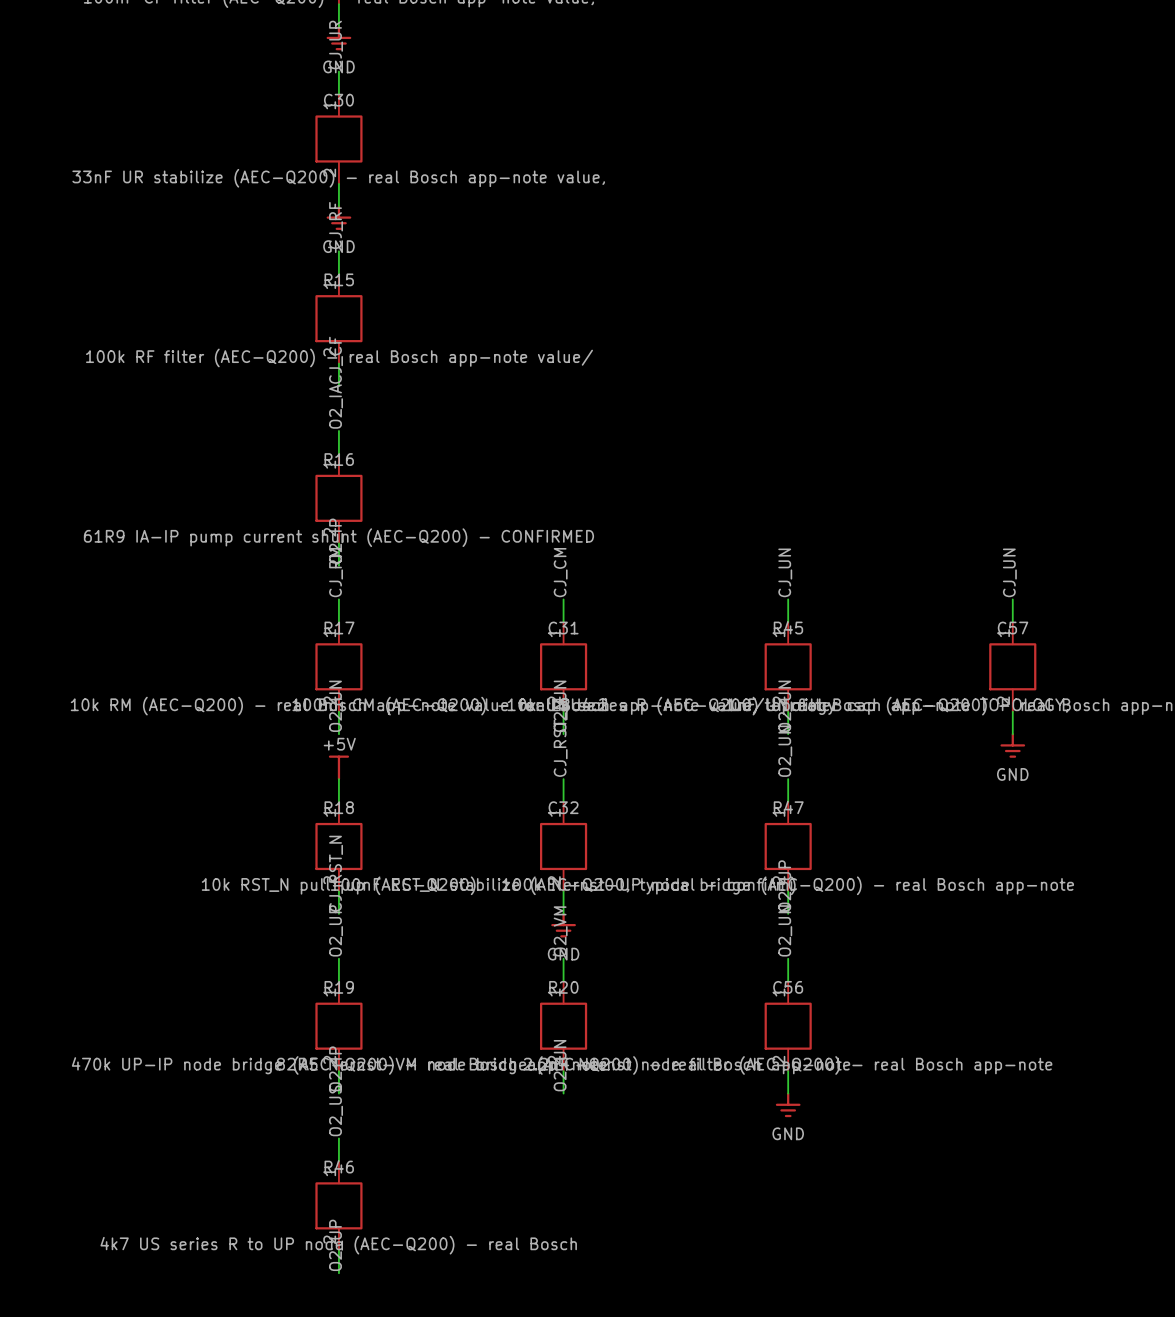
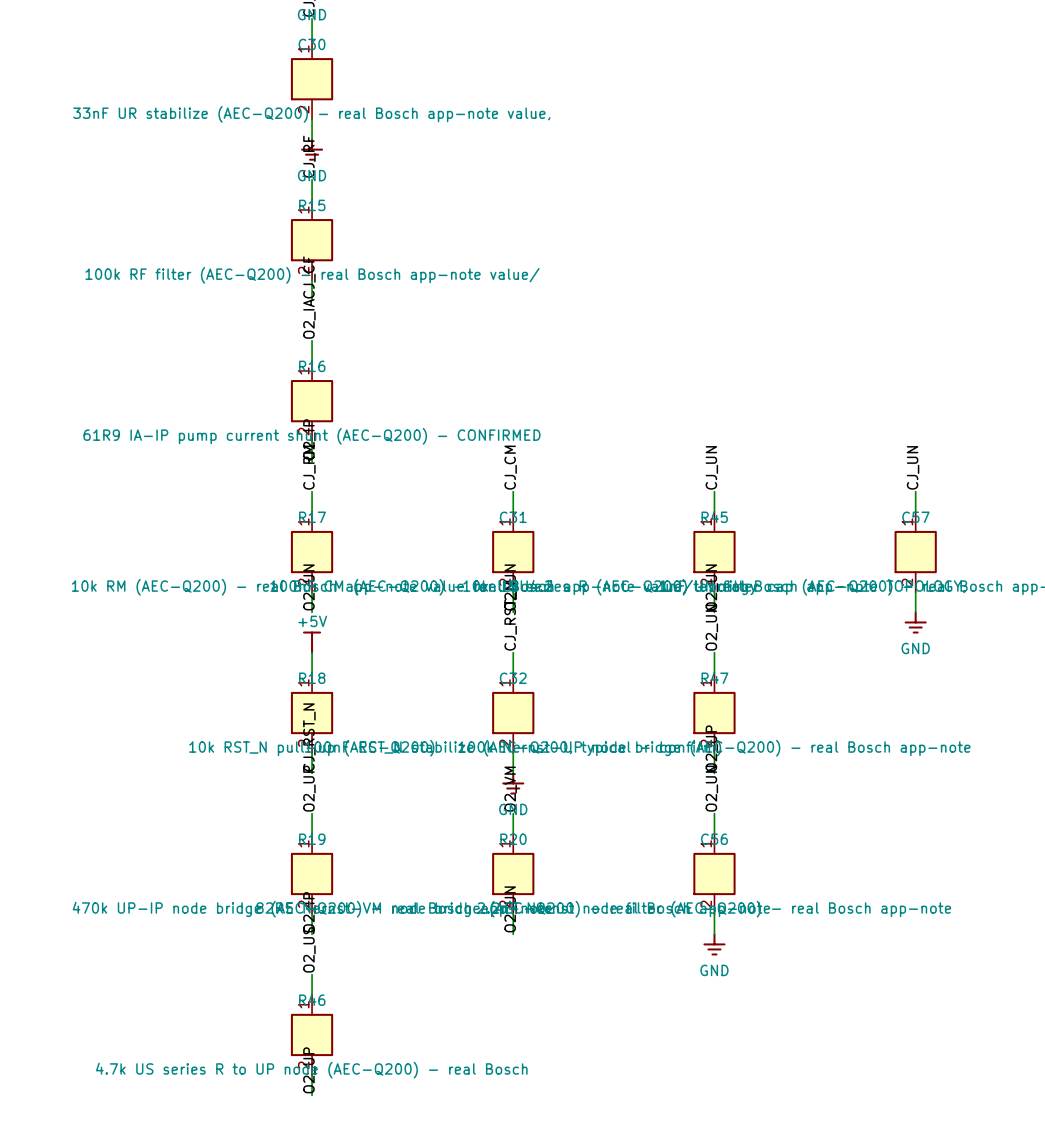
R46 value: 4k7 US series R to UP node (AEC-Q200) - real Bosch (338, 1245) -> 4.7k US series R to UP node (AEC-Q200) - real Bosch (311, 1070)

